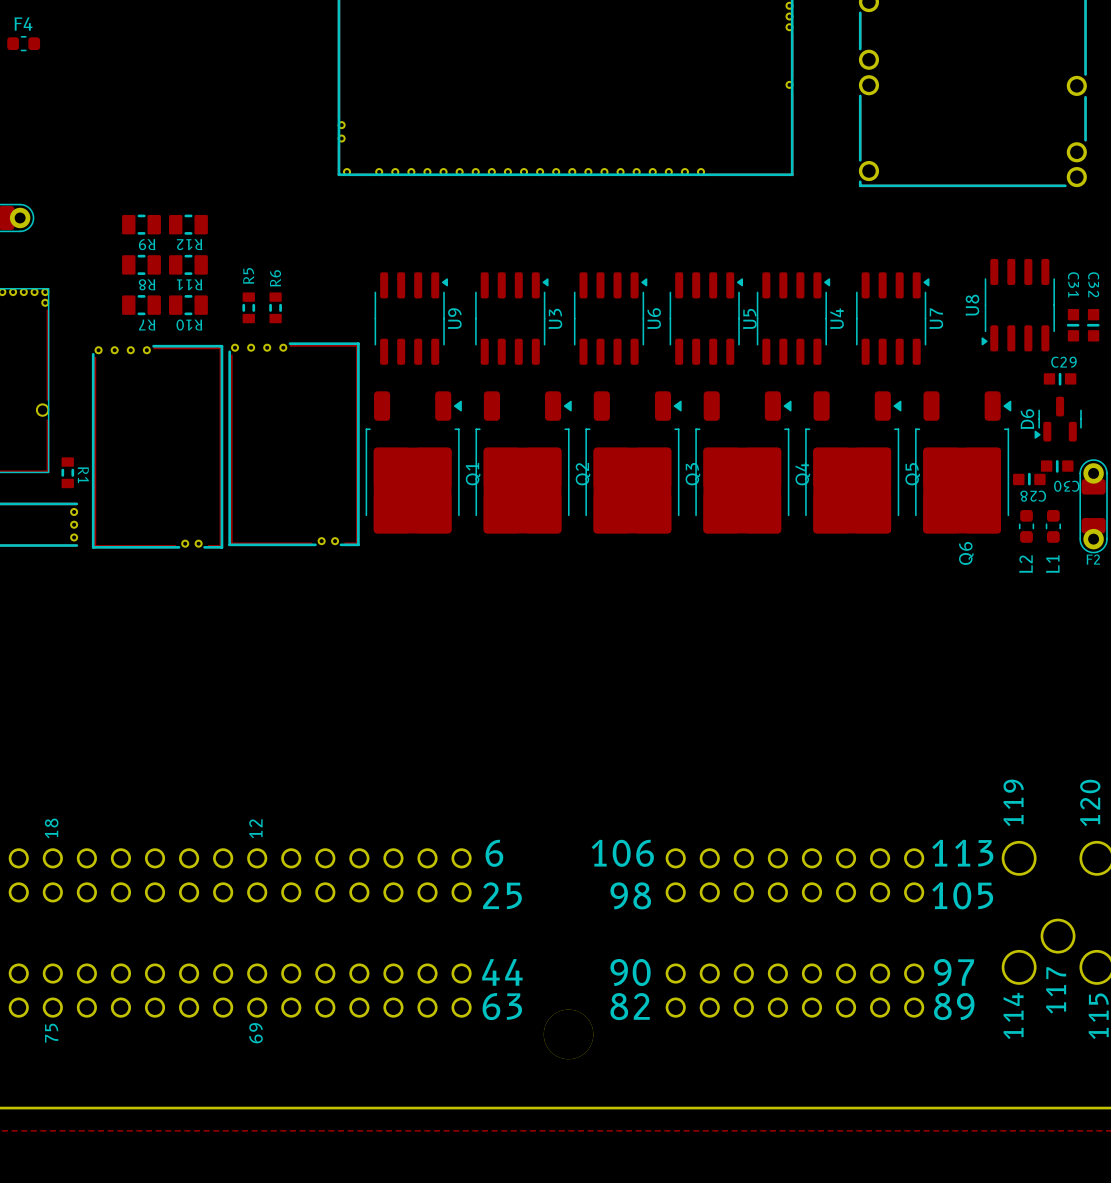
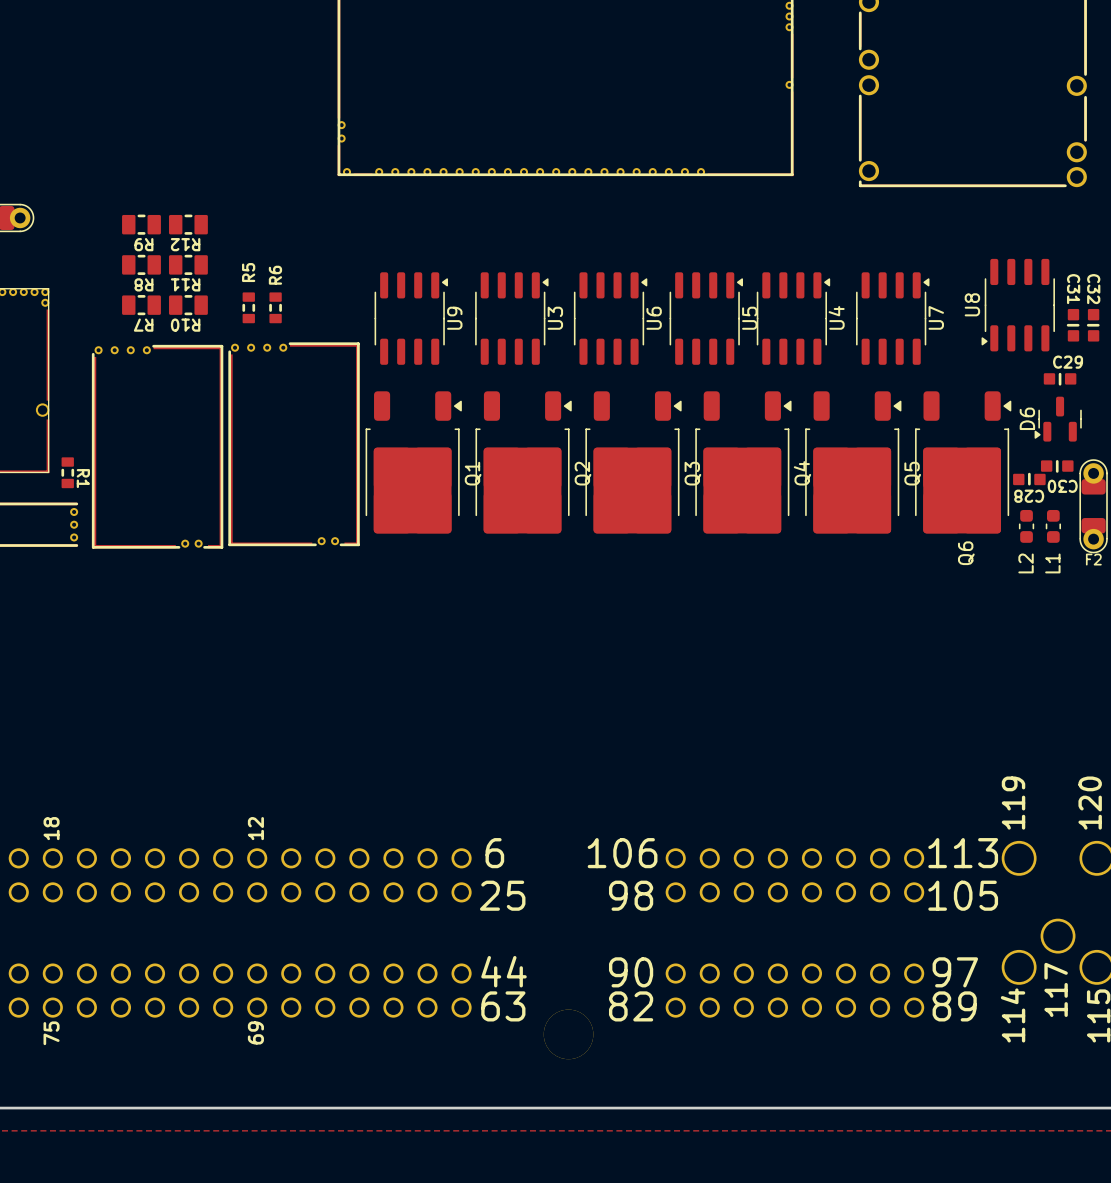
F4: (23, 43) -> none

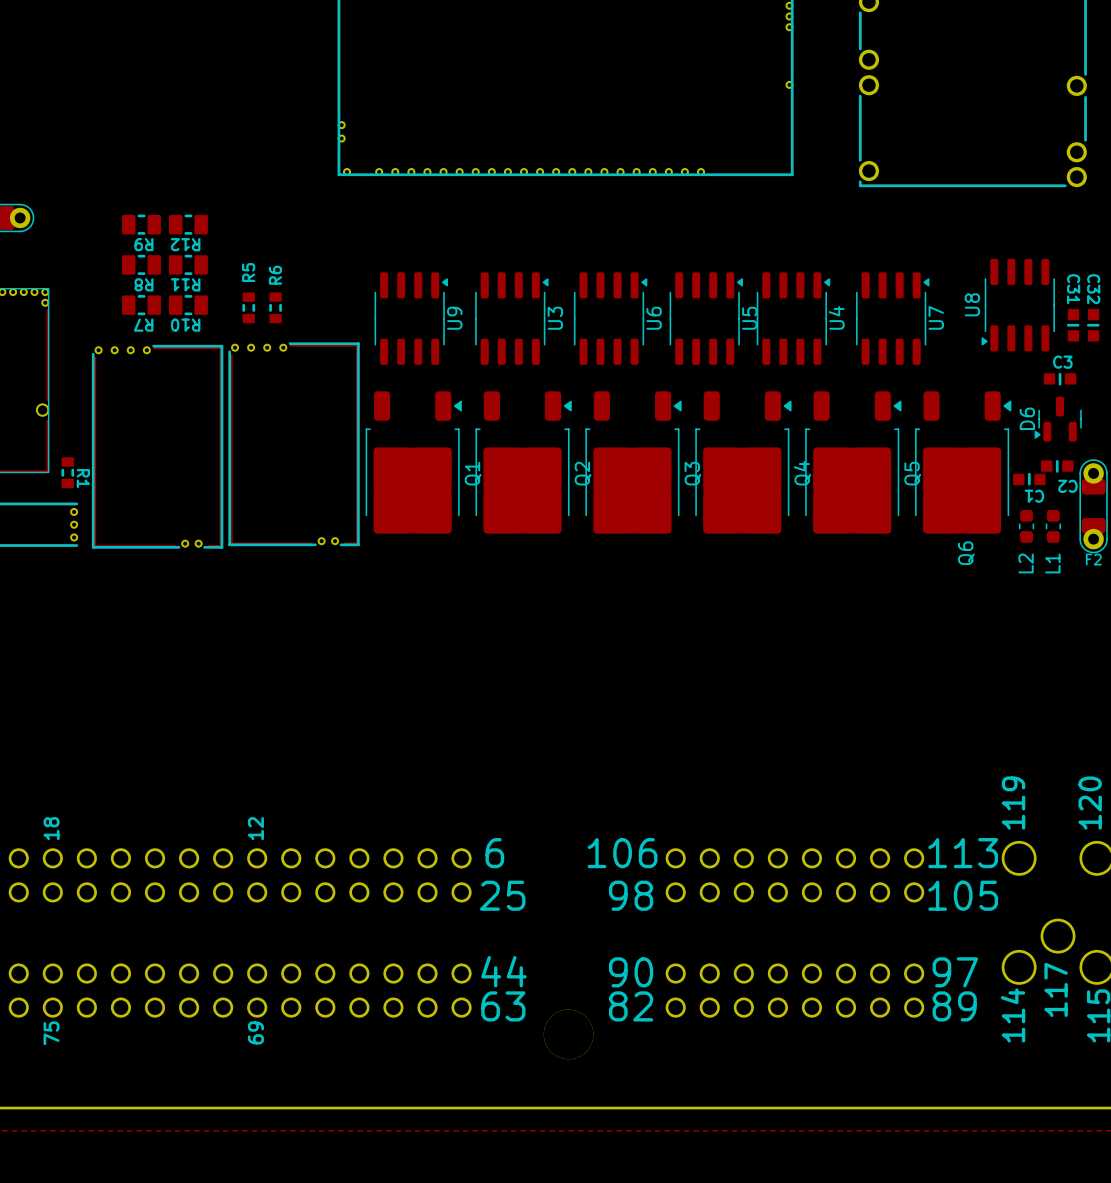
C29 name: C29 (1068, 362) -> C3 (1062, 362)
C30 name: C30 (1062, 486) -> C2 (1067, 486)
C28 name: C28 (1029, 496) -> C1 (1034, 496)

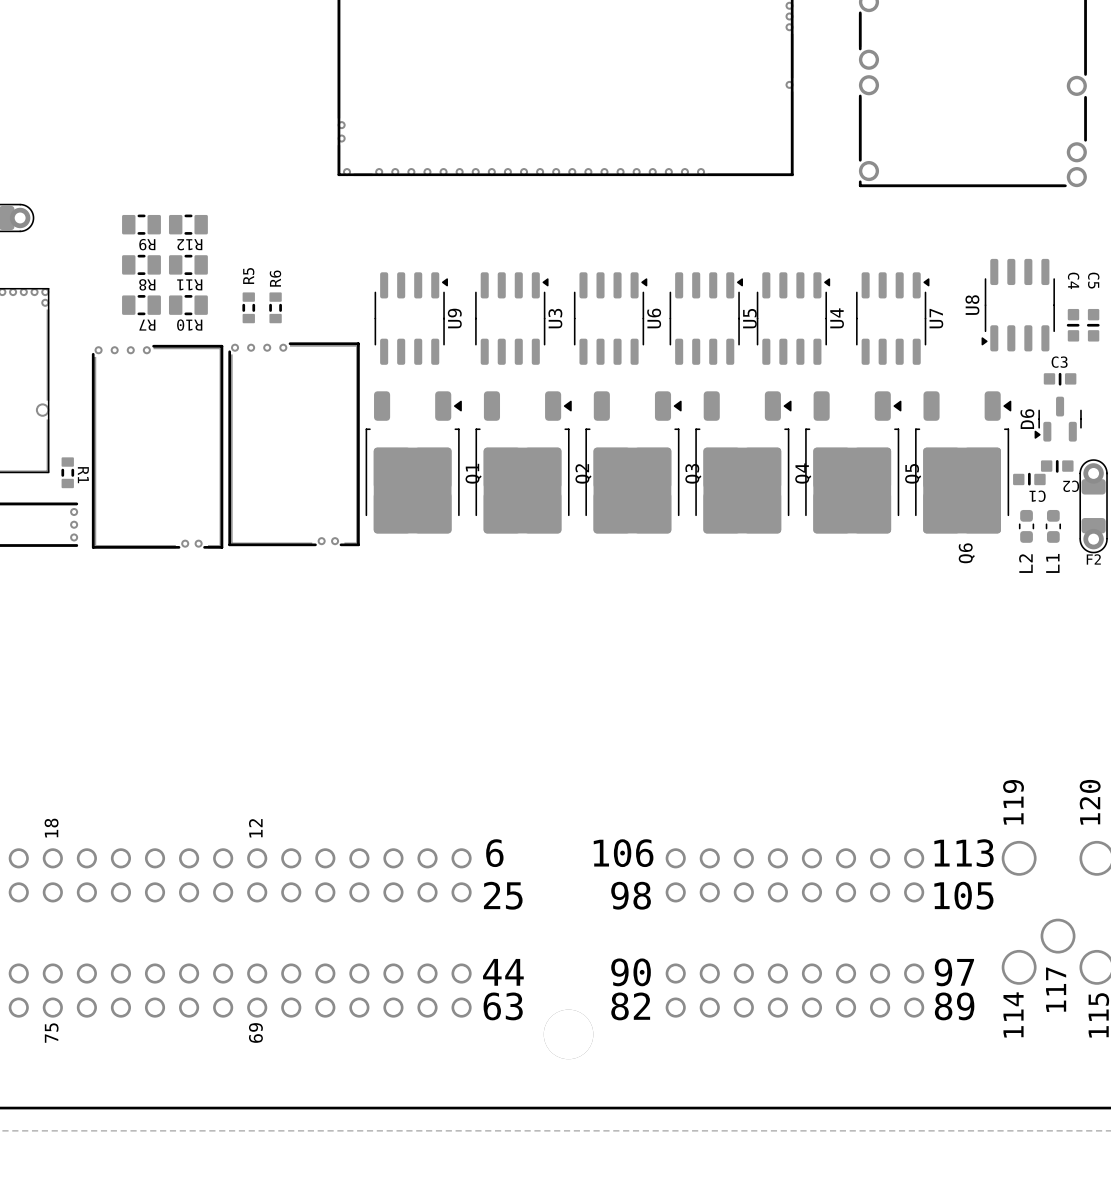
C31 name: C31 (1073, 289) -> C4 (1073, 280)
C32 name: C32 (1093, 289) -> C5 (1093, 280)

